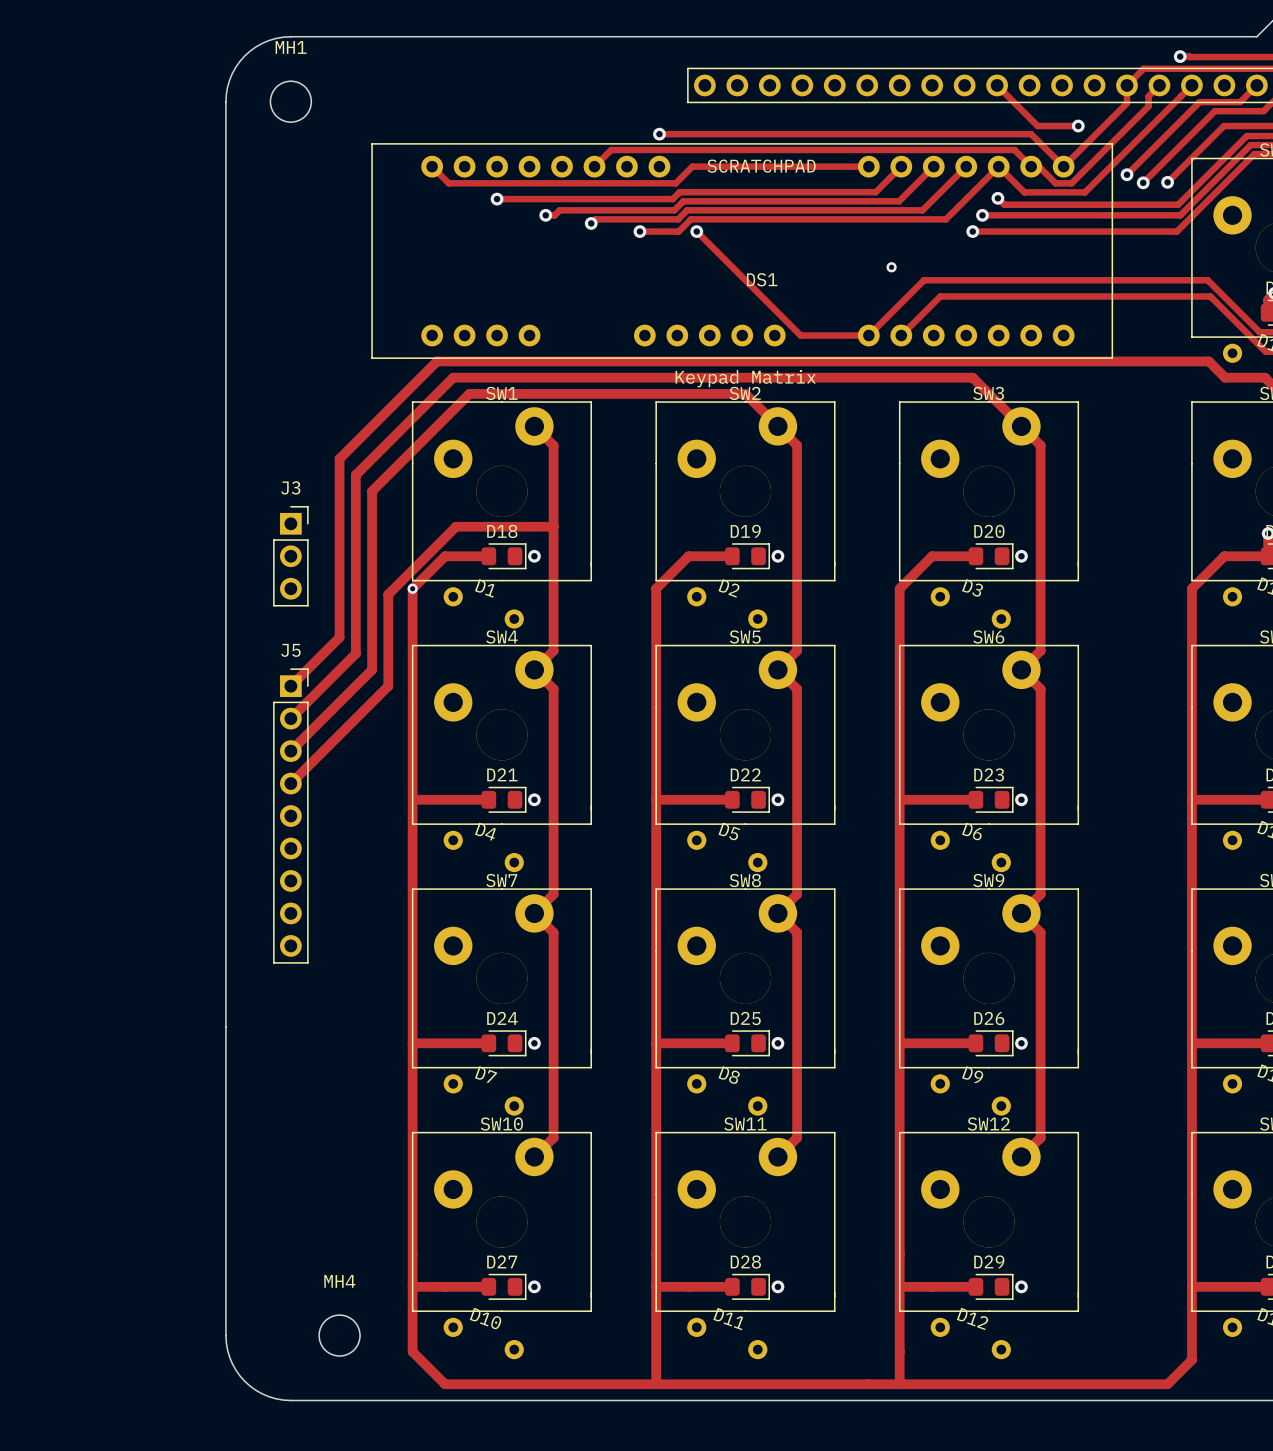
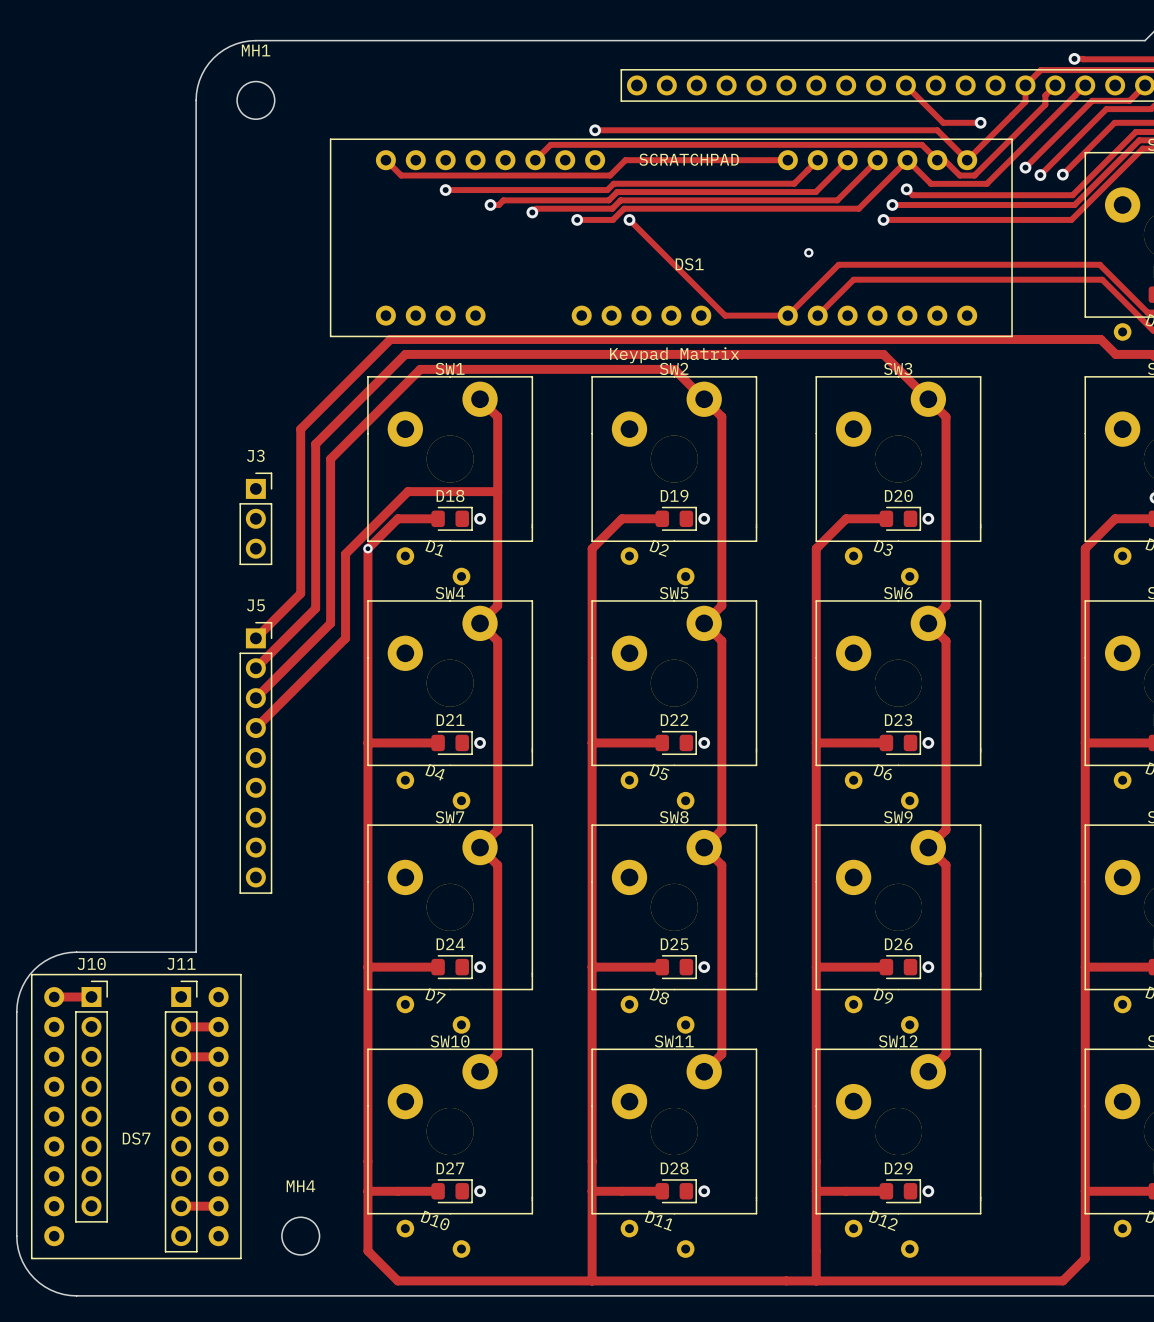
board edge: (225, 1027) (225, 1335) (227, 1350) (235, 1370) (250, 1386) (269, 1396) (290, 1400) -> (196, 952) (69, 952) (44, 961) (25, 980) (18, 998) (16, 1011) (18, 1249) (22, 1262) (34, 1278) (44, 1286) (63, 1294) (255, 1295)
track: none -> (54, 997) (91, 997)
track: none -> (181, 1026) (218, 1026)
track: none -> (181, 1056) (218, 1056)
J10: none -> (91, 1101)
DS7: none -> (136, 1116)
J11: none -> (181, 1116)
track: none -> (181, 1206) (218, 1206)

